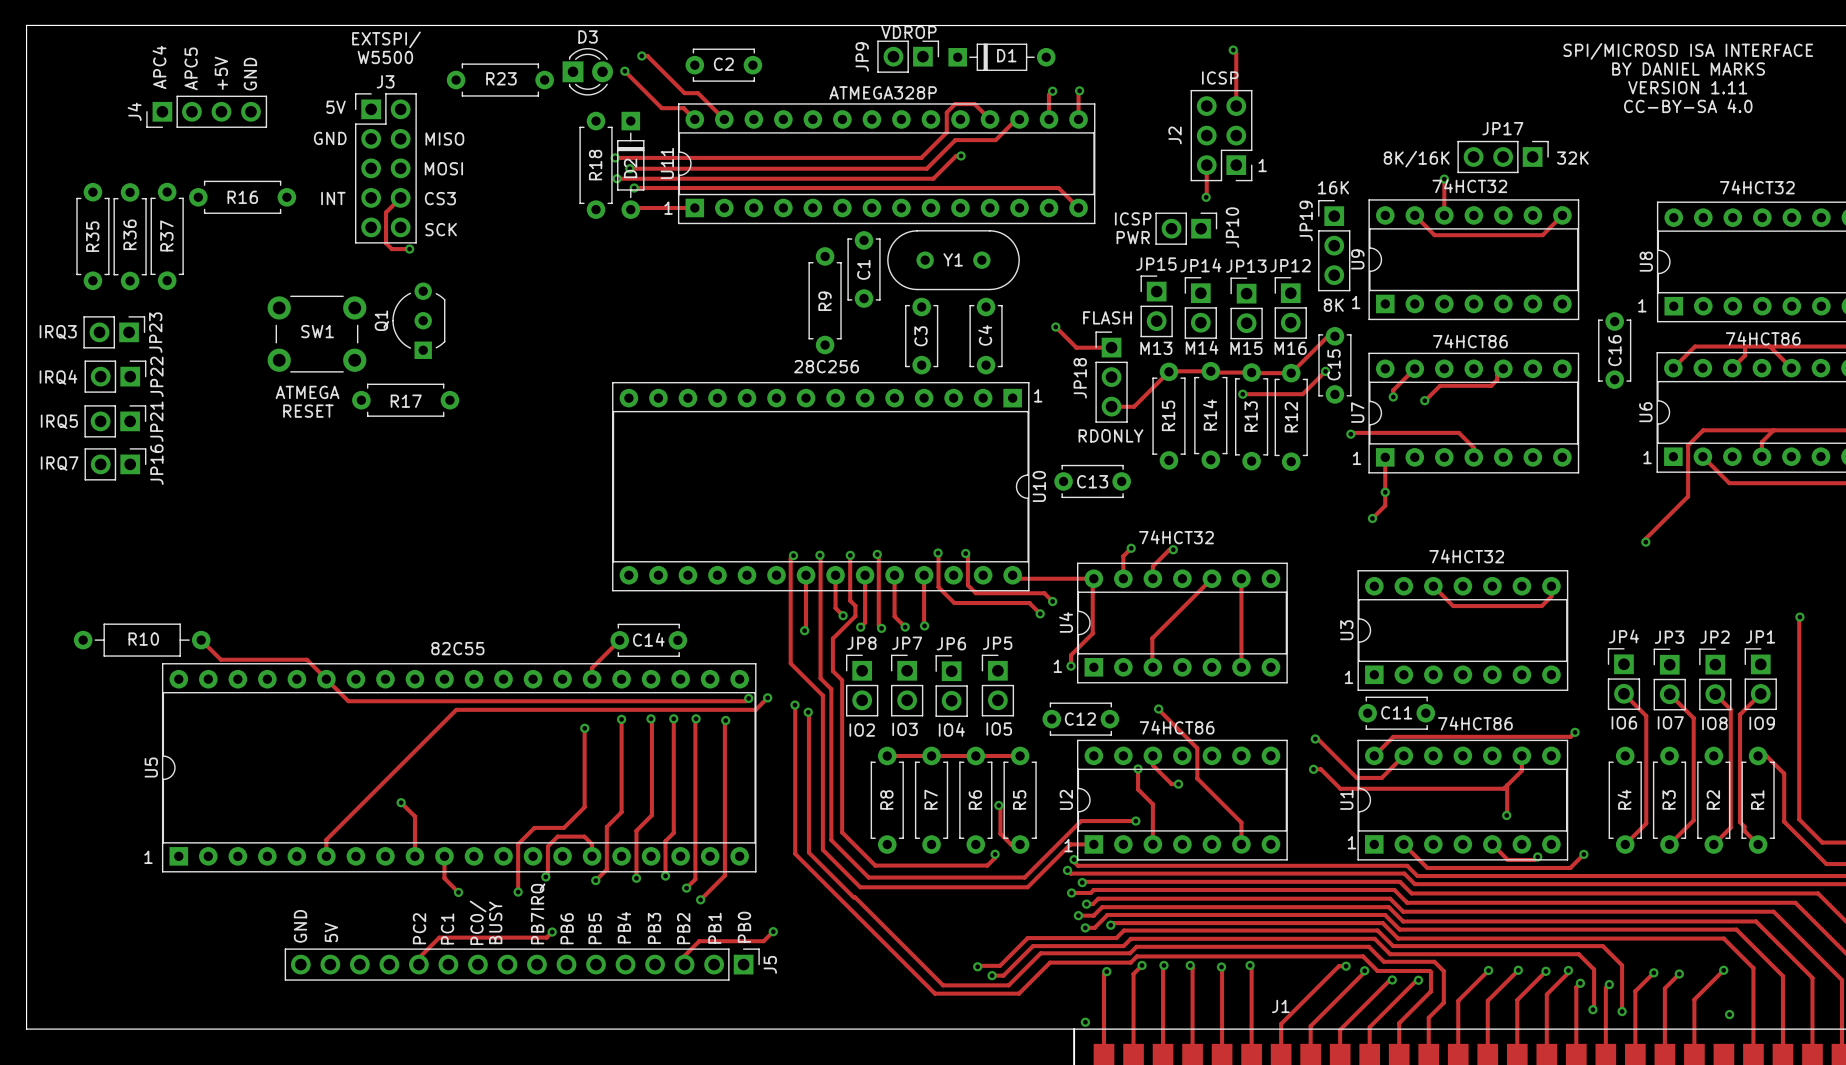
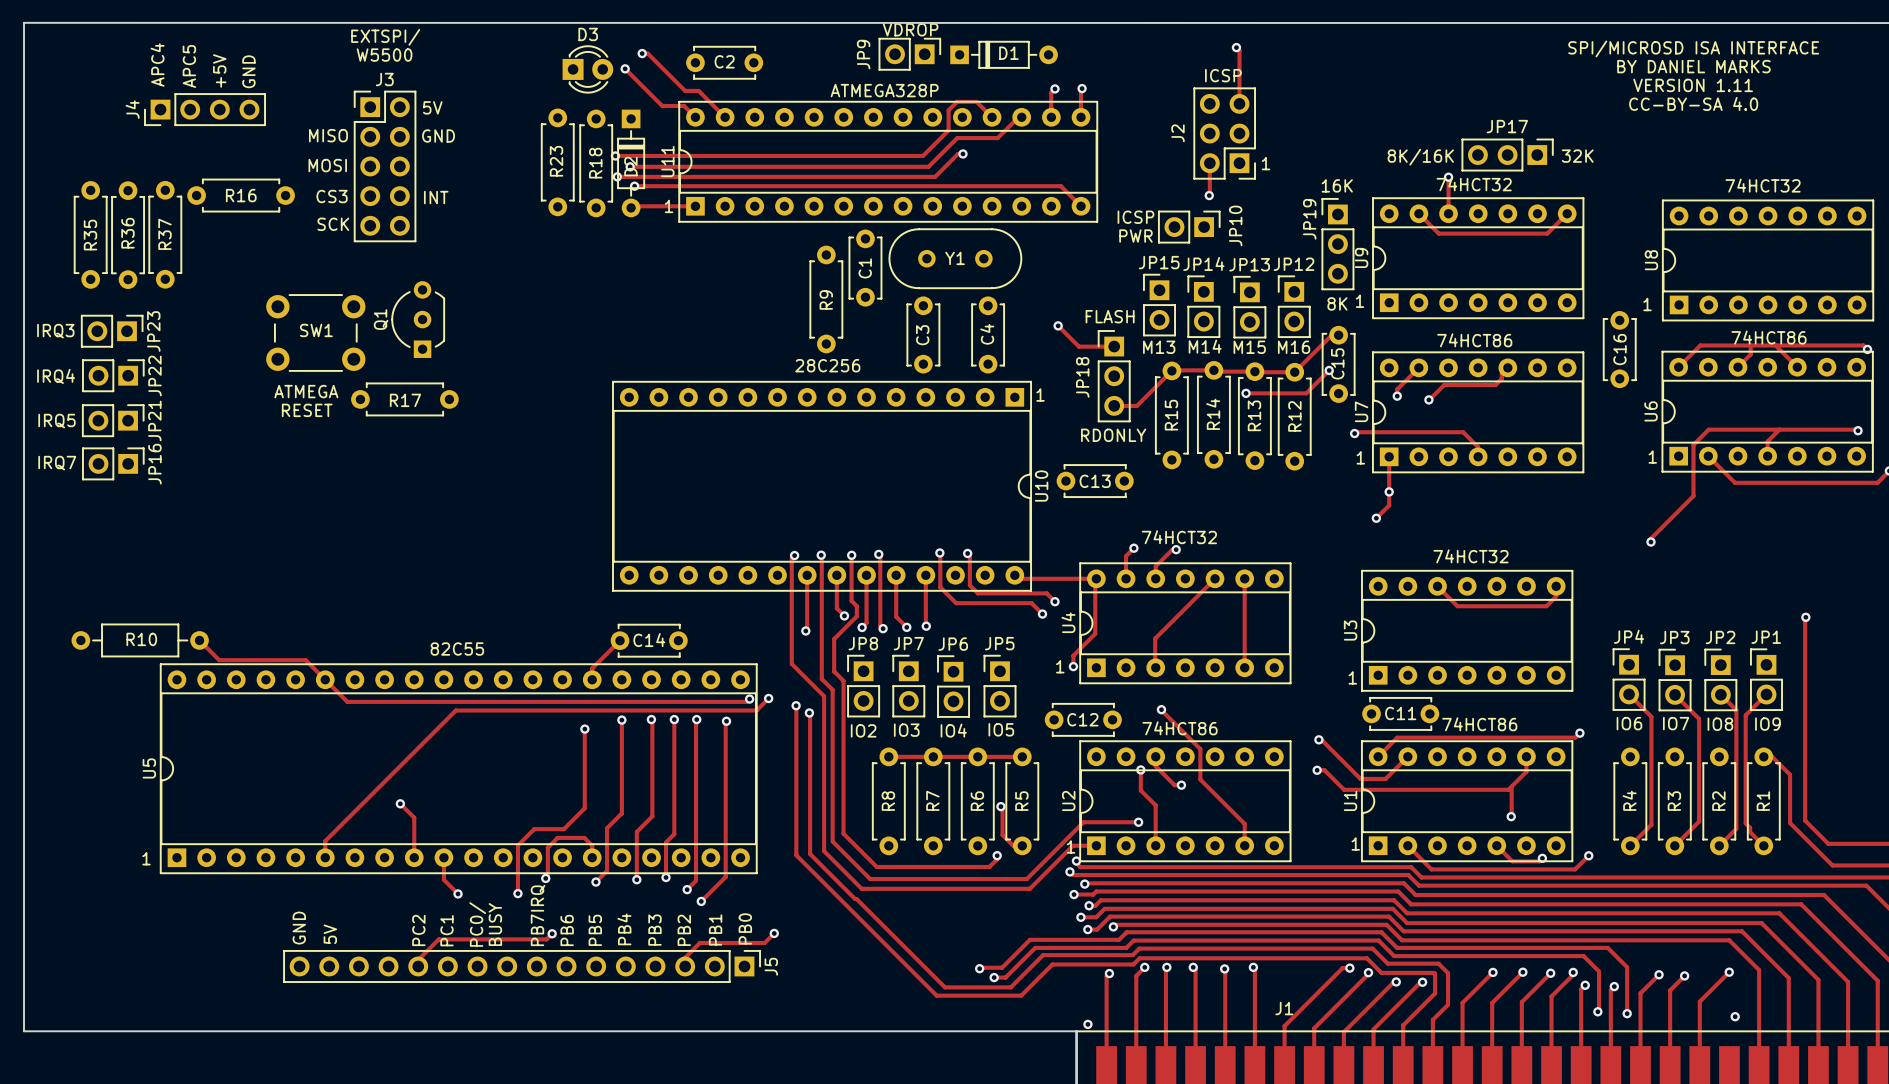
R23 rotation: 0° (500, 80) -> 90° clockwise (557, 162)
R23 position: (500, 80) -> (557, 162)
text position: 5V (336, 107) -> 5V (432, 107)
text: GND (330, 138) -> MISO (328, 135)
text: MISO (444, 139) -> GND (438, 136)
text position: MOSI (443, 168) -> MOSI (327, 165)
track: (400, 197) (386, 212) (386, 243) (391, 249) (409, 249) -> none
text: INT (333, 198) -> CS3 (332, 196)
text: CS3 (440, 198) -> INT (436, 197)
text position: SCK (441, 229) -> SCK (333, 224)
via: (409, 249) -> none

